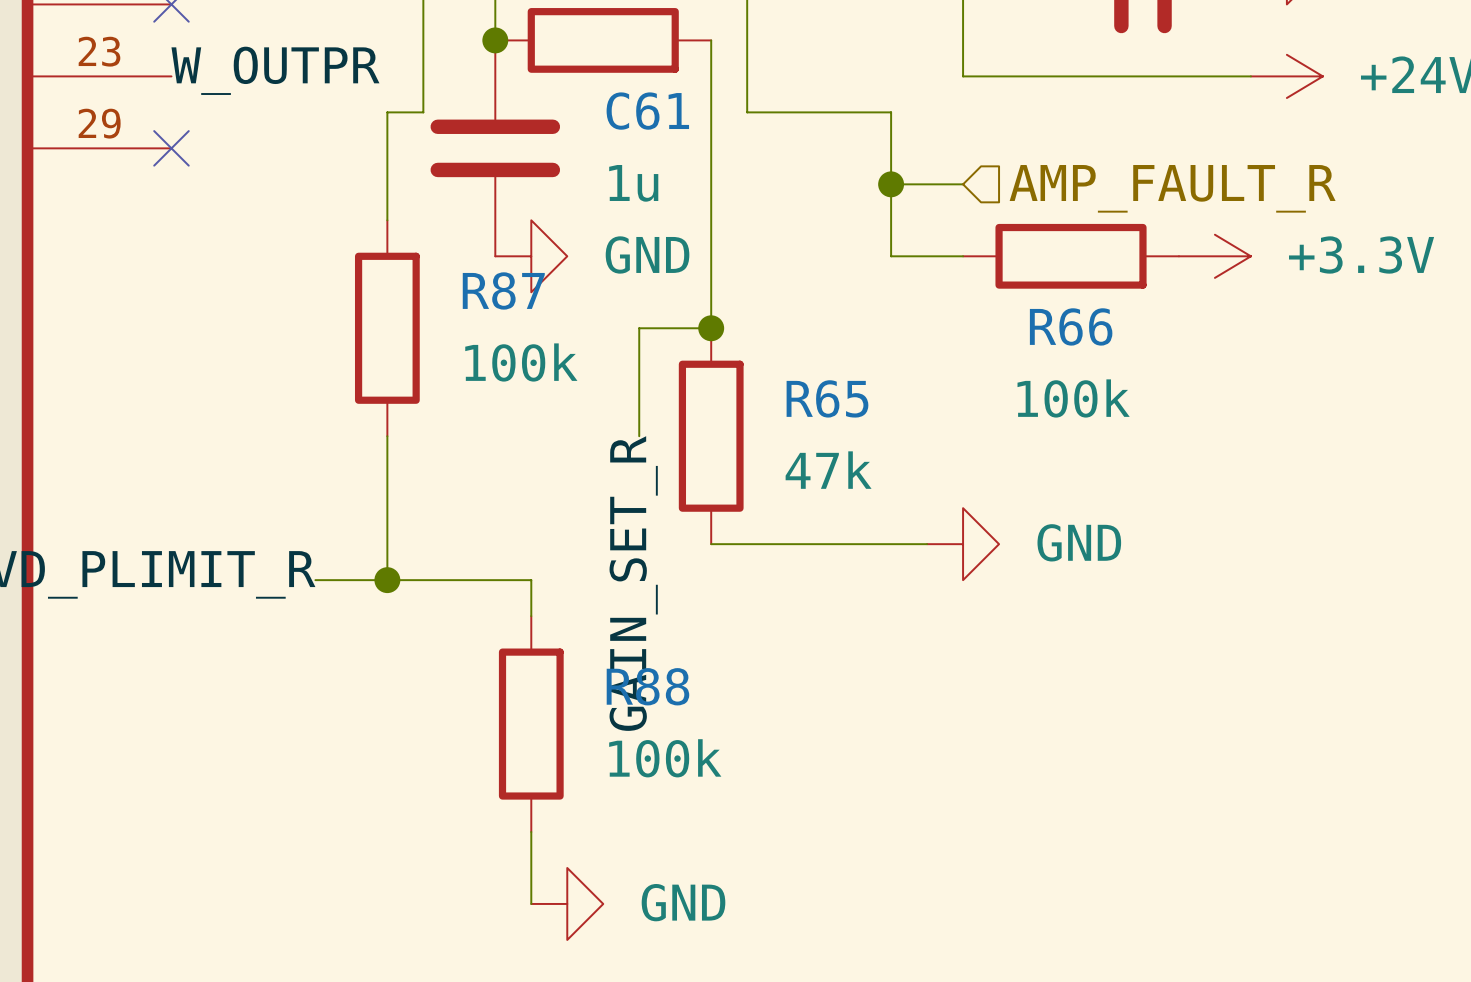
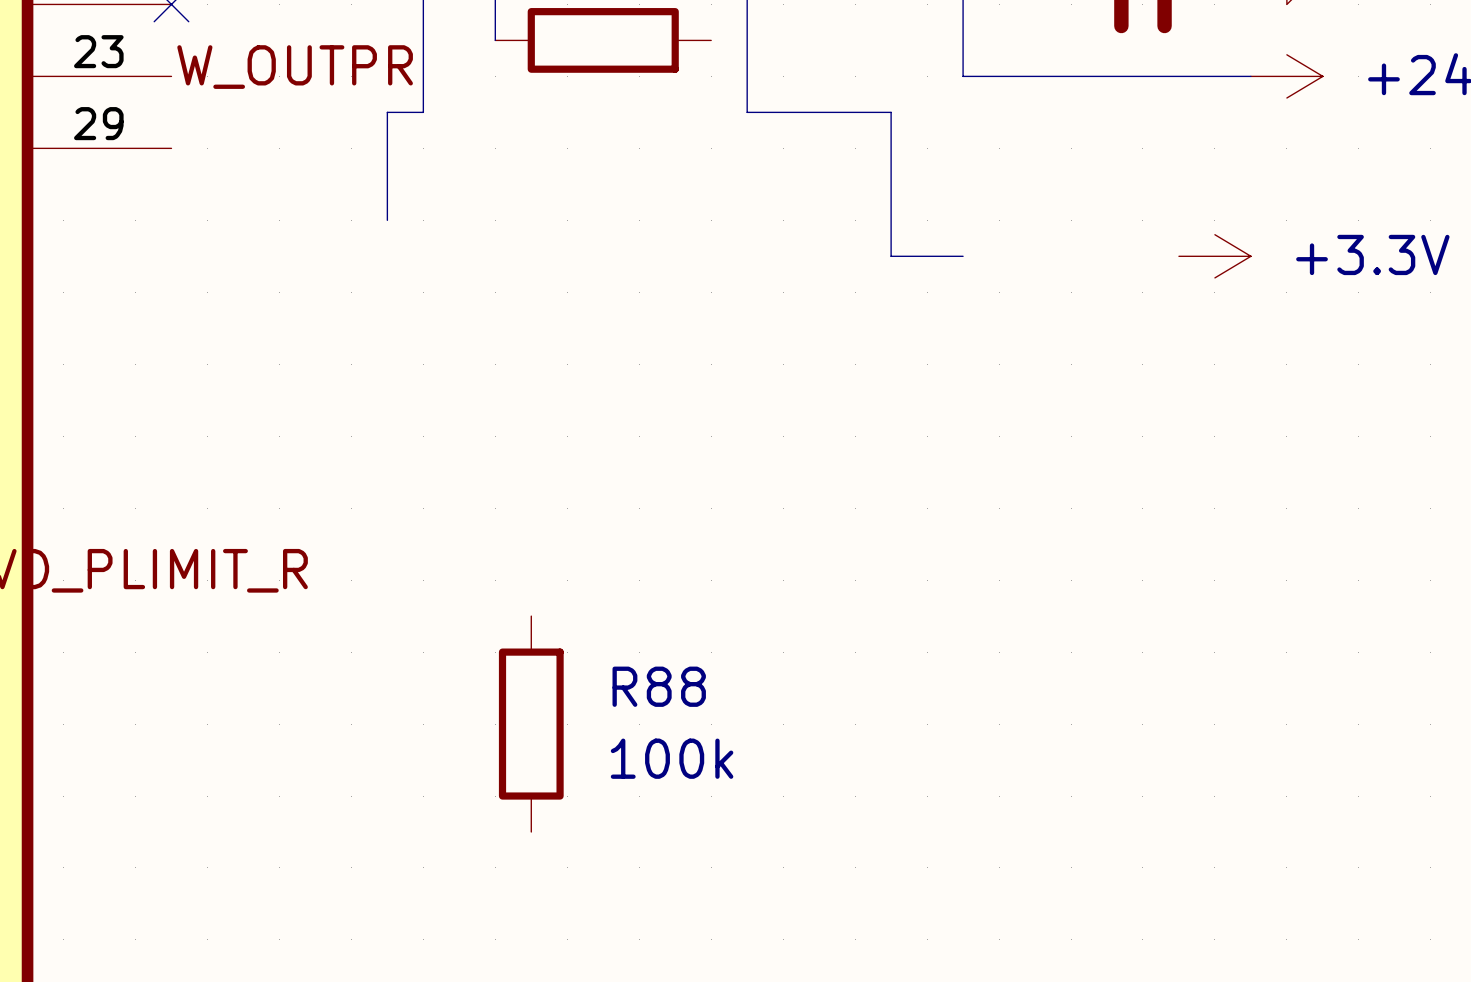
junction: (495, 40) -> none
wire: (711, 40) (711, 328) (639, 328) (639, 436) -> none
no-connect mark: (171, 148) -> none
C61: 1u (495, 148) -> none
wire: (891, 184) (963, 184) -> none
junction: (891, 184) -> none
hierarchical label: AMP_FAULT_R (1172, 188) -> none
power symbol: GND (531, 256) -> none
R66: 100k (1071, 256) -> none
R87: 100k (387, 328) -> none
junction: (711, 328) -> none
wire: (387, 436) (387, 580) -> none
R65: 47k (711, 436) -> none
wire: (711, 544) (927, 544) -> none
power symbol: GND (963, 544) -> none
wire: (315, 580) (531, 580) (531, 616) -> none
junction: (387, 580) -> none
label: GAIN_SET_R (633, 583) -> none
wire: (531, 832) (531, 903) -> none
power symbol: GND (567, 903) -> none

